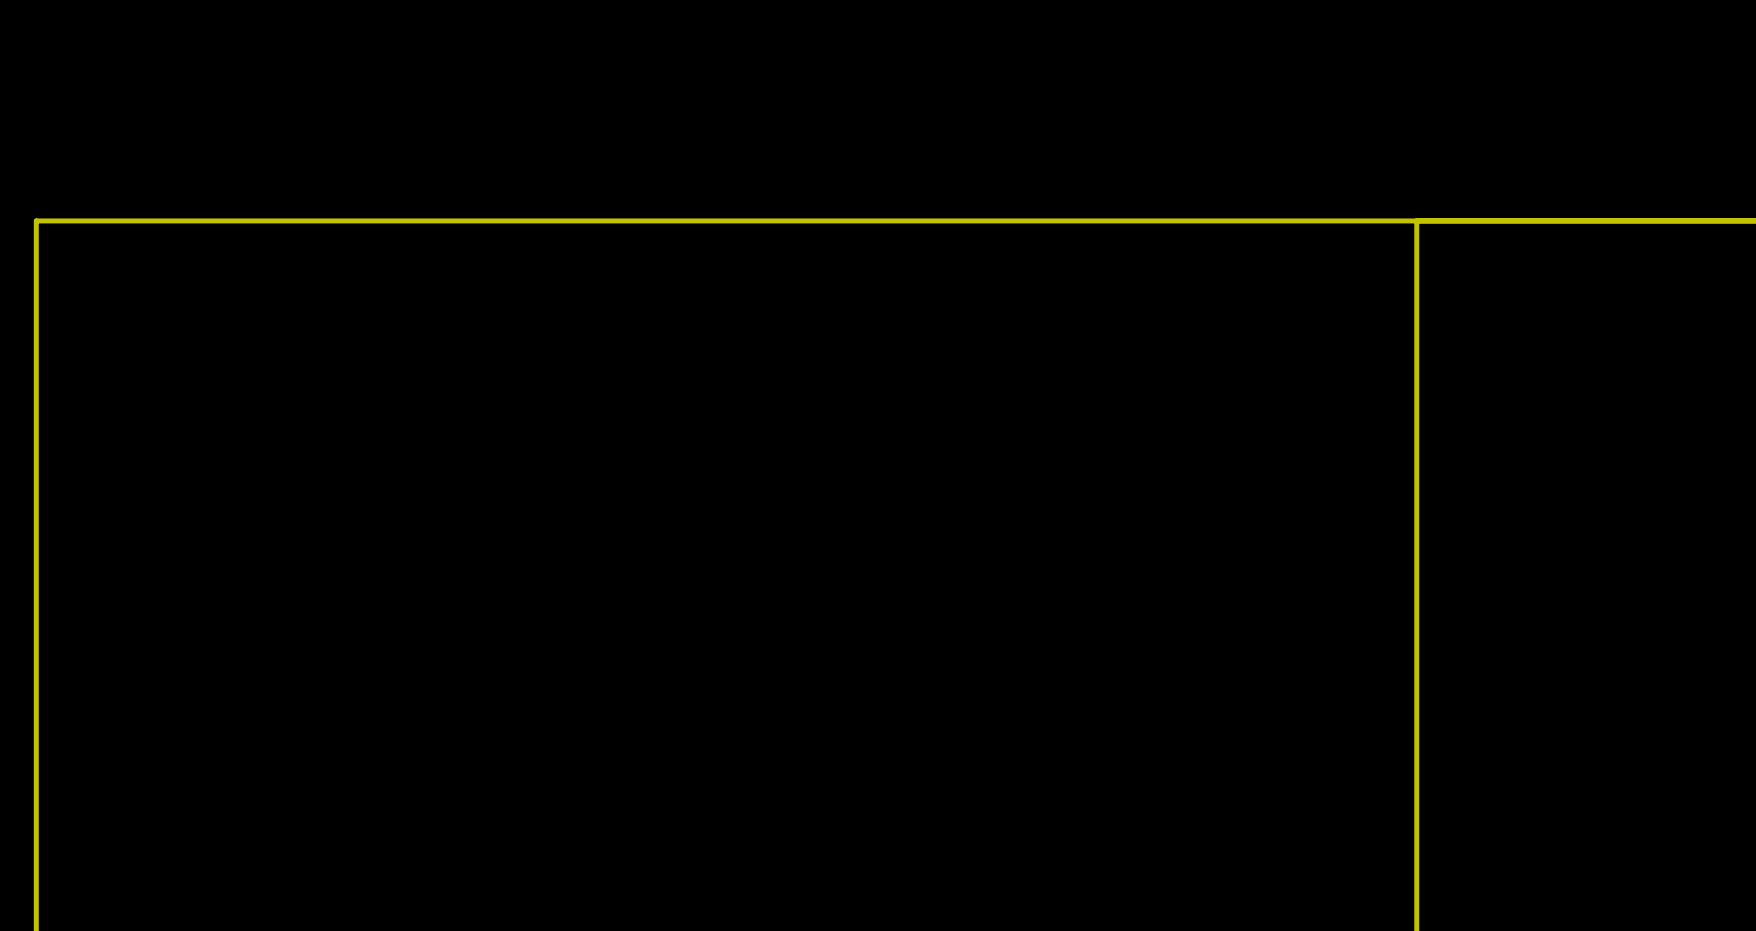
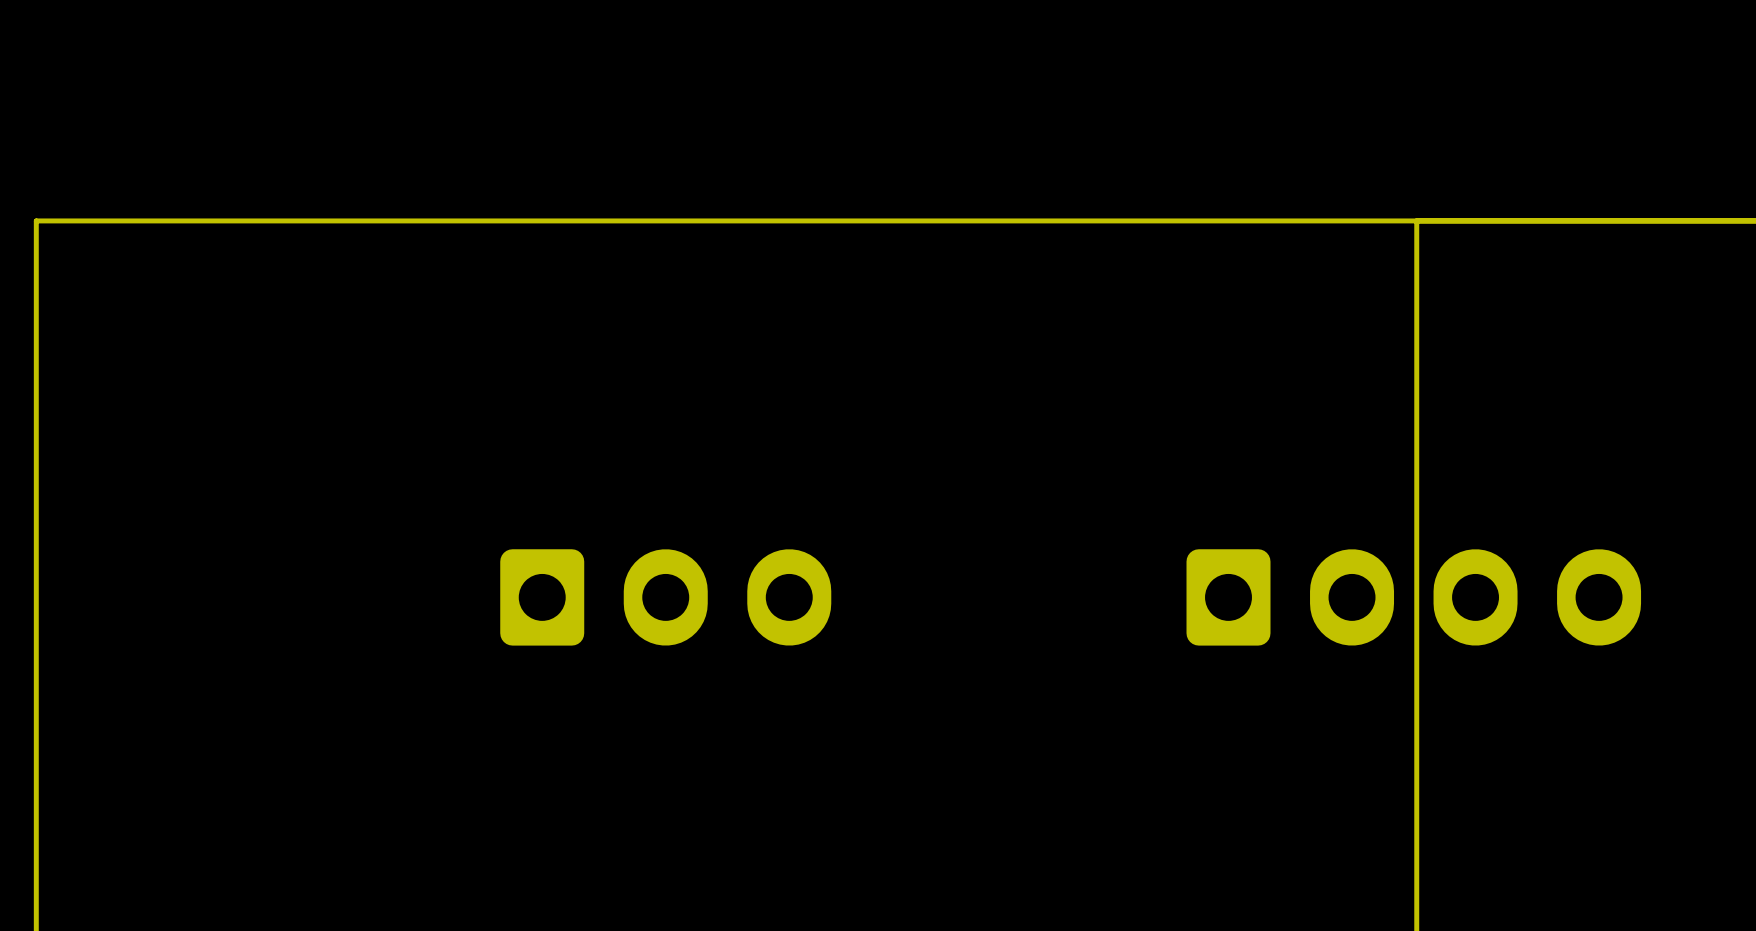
part: none -> (665, 597)
part: none -> (1413, 597)

